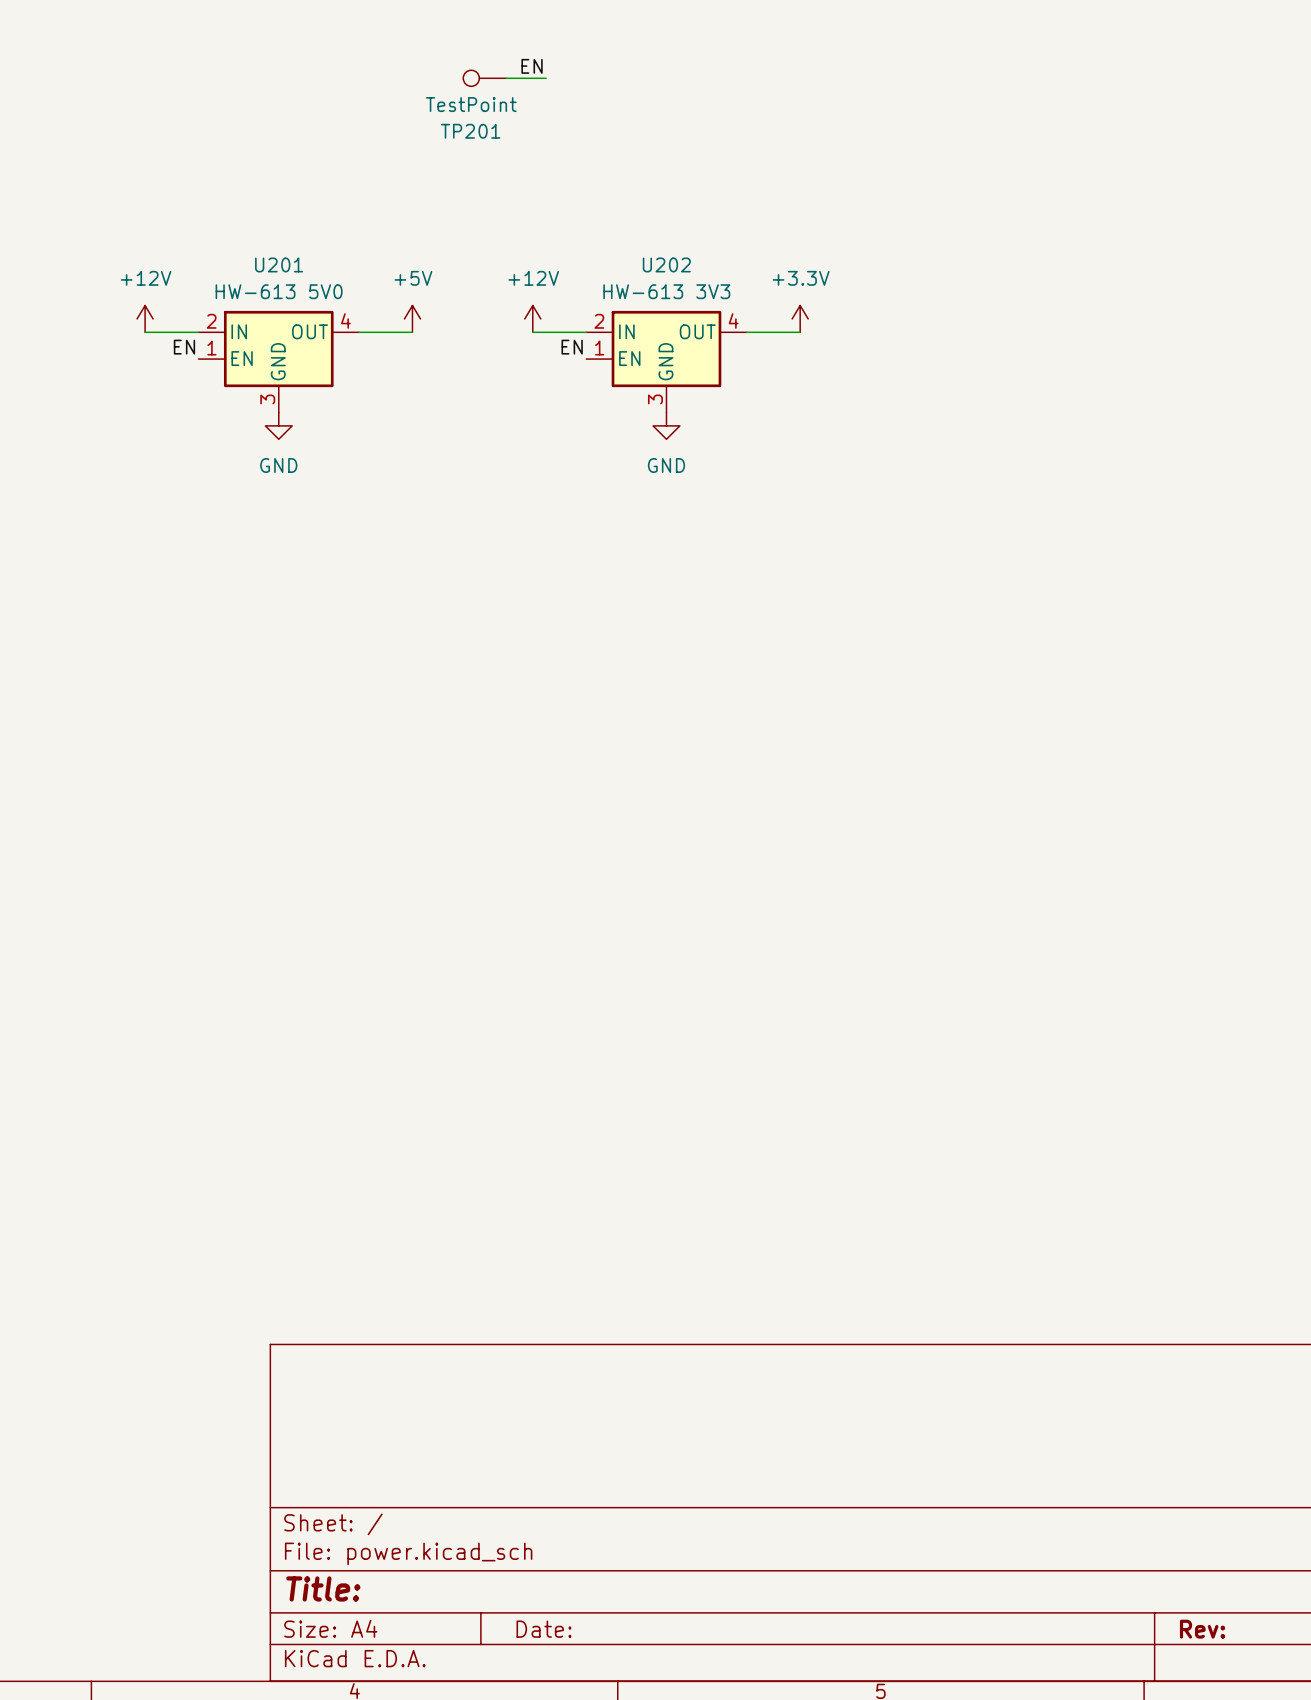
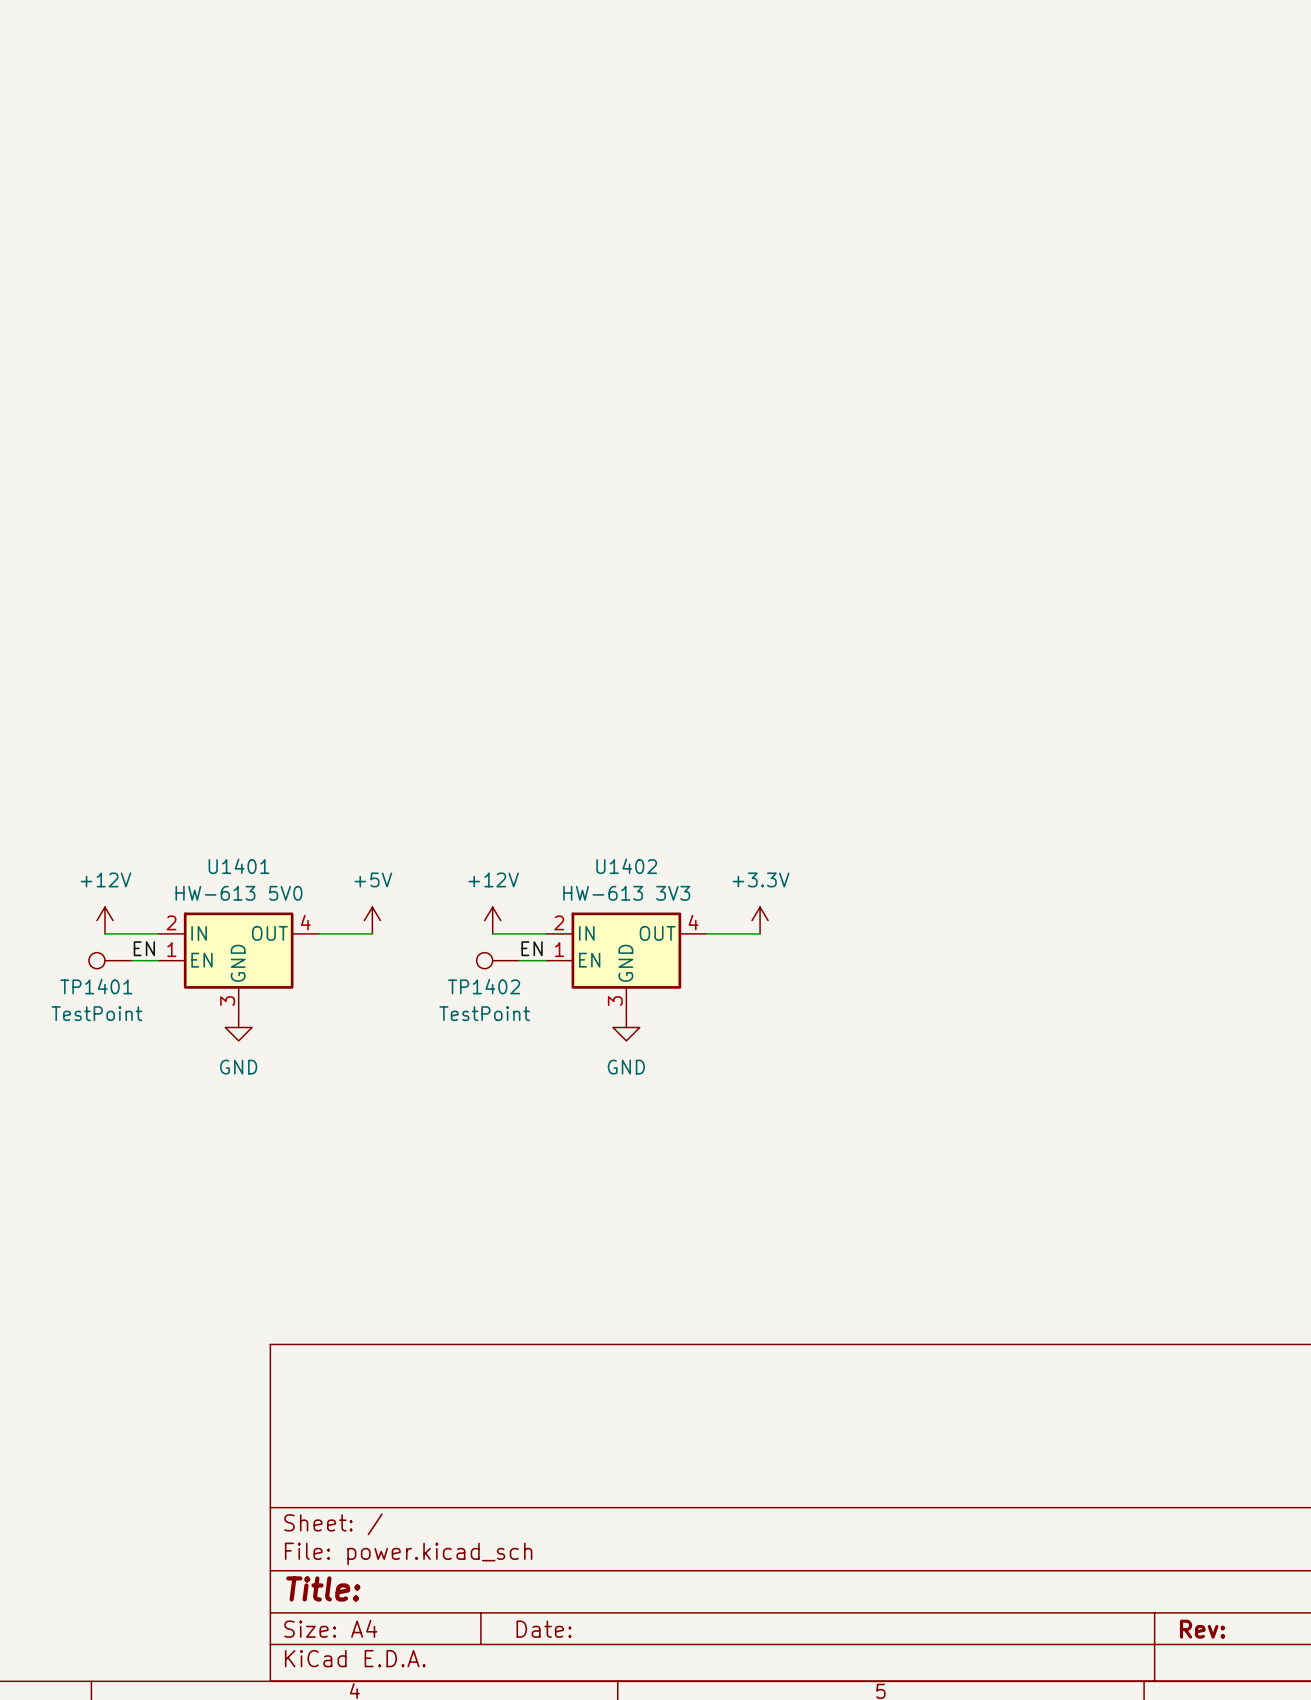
label: EN (532, 66) -> none
TP201: TestPoint (484, 78) -> none
wire: (506, 78) (546, 78) -> none
power symbol: +12V (145, 318) -> none
power symbol: +5V (412, 318) -> none
power symbol: +12V (532, 318) -> none
power symbol: +3.3V (800, 318) -> none
wire: (145, 332) (198, 332) -> none
wire: (358, 332) (412, 332) -> none
wire: (532, 332) (586, 332) -> none
wire: (746, 332) (800, 332) -> none
label: EN (184, 347) -> none
label: EN (572, 347) -> none
U201: HW-613 5V0 (278, 361) -> none
U202: HW-613 3V3 (666, 361) -> none
power symbol: GND (278, 425) -> none
power symbol: GND (666, 425) -> none
power symbol: none -> +12V (104, 920)
power symbol: none -> +5V (372, 920)
power symbol: none -> +12V (492, 920)
power symbol: none -> +3.3V (760, 920)
wire: none -> (104, 933) (158, 933)
wire: none -> (318, 933) (372, 933)
wire: none -> (492, 933) (546, 933)
wire: none -> (706, 933) (760, 933)
label: none -> EN (144, 948)
label: none -> EN (532, 948)
TP1401: none -> TestPoint (110, 960)
wire: none -> (131, 960) (158, 960)
TP1402: none -> TestPoint (498, 960)
wire: none -> (519, 960) (546, 960)
U1401: none -> HW-613 5V0 (238, 963)
U1402: none -> HW-613 3V3 (626, 963)
power symbol: none -> GND (238, 1027)
power symbol: none -> GND (626, 1027)

